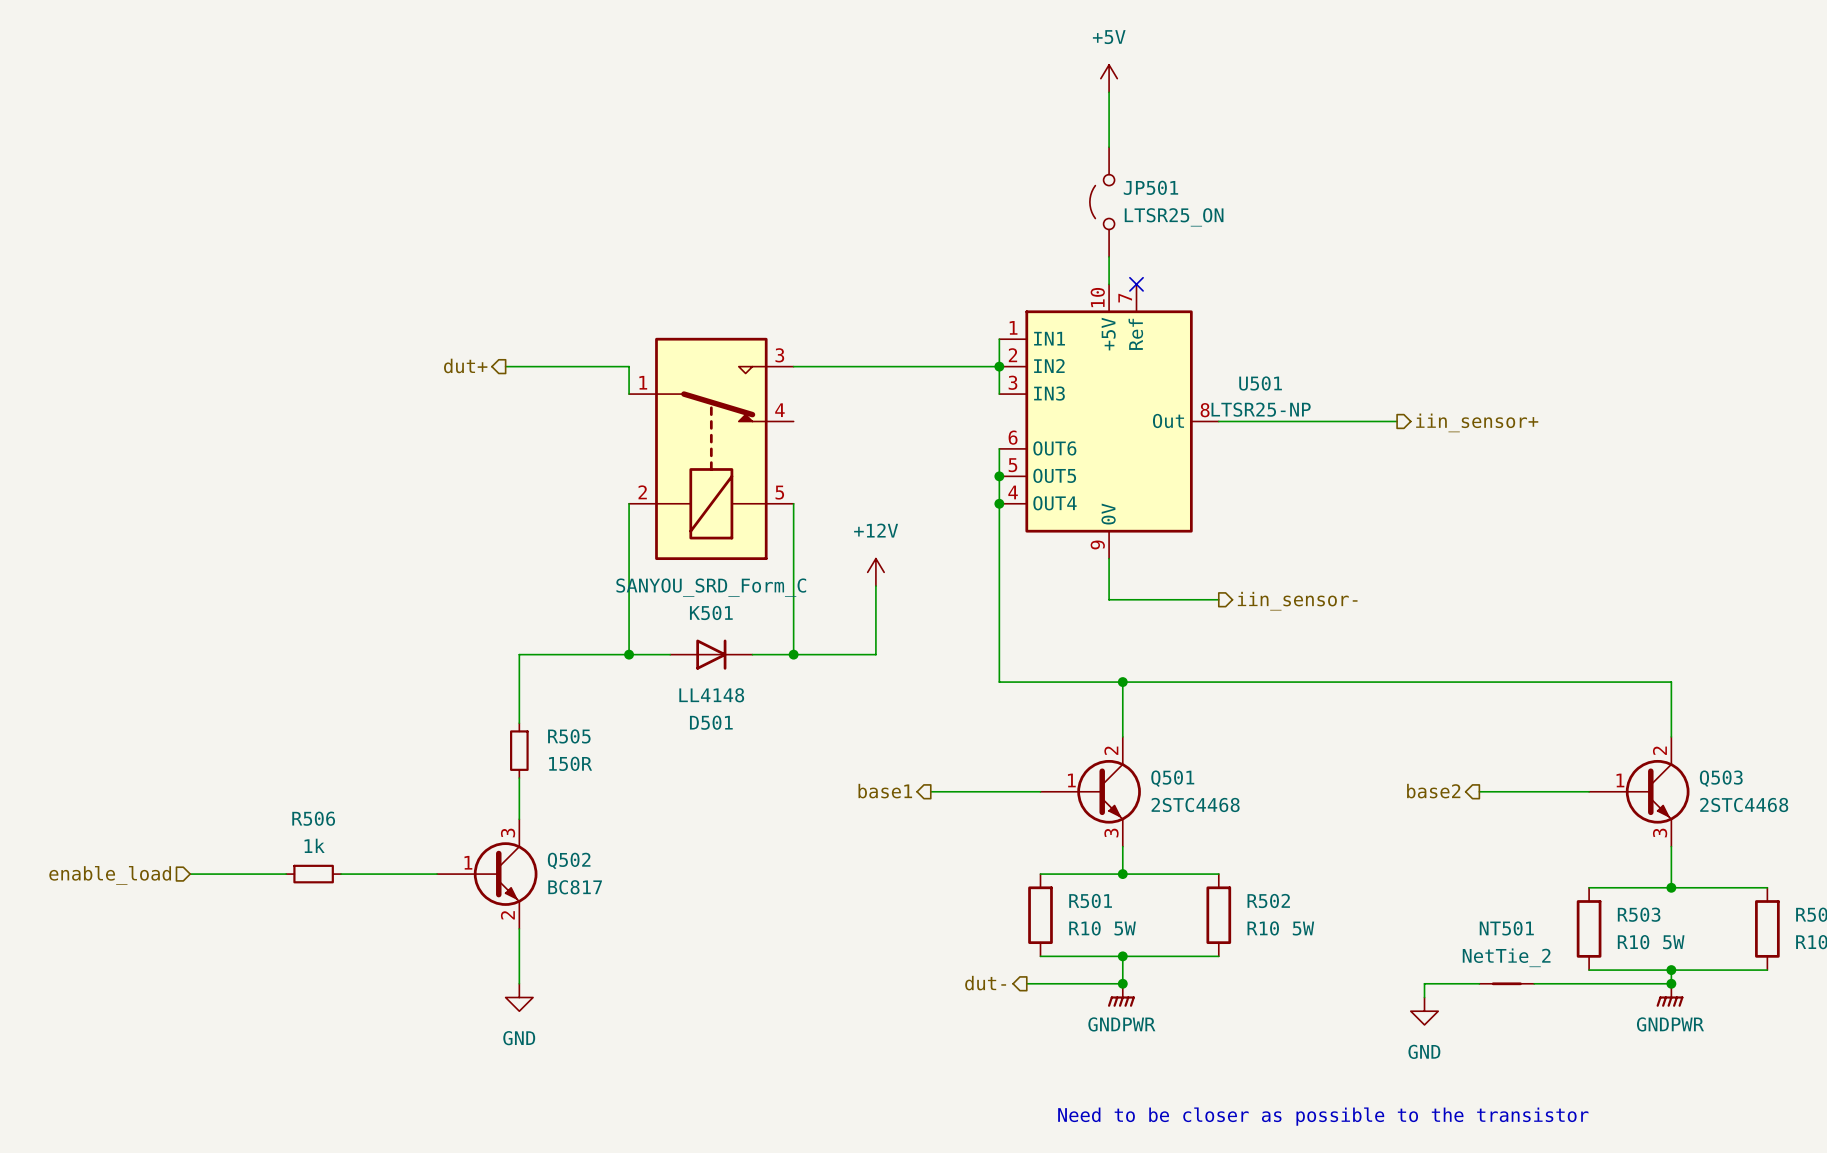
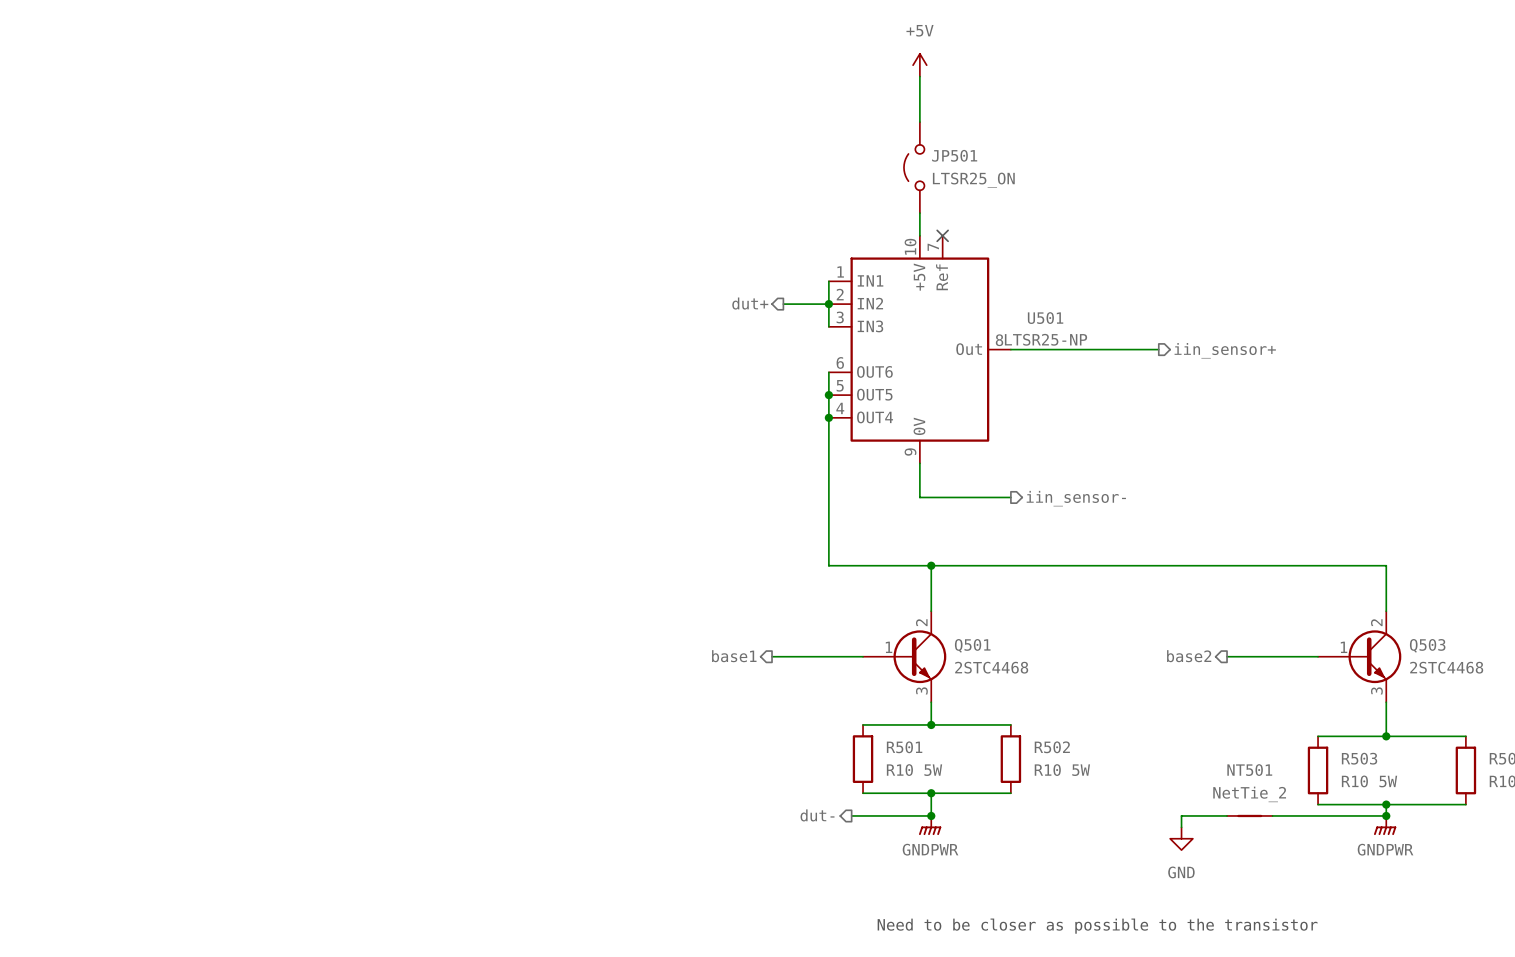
hierarchical label: dut+ (465, 365) -> none
hierarchical label: none -> dut+ (750, 303)
wire: (505, 366) (629, 366) (629, 394) -> none
wire: (793, 366) (944, 366) -> none
K501: SANYOU_SRD_Form_C (711, 448) -> none
wire: (629, 503) (629, 654) -> none
wire: (793, 503) (793, 654) -> none
power symbol: +12V (875, 572) -> none
wire: (875, 586) (875, 654) (752, 654) -> none
junction: (629, 654) -> none
wire: (670, 654) (519, 654) (519, 723) -> none
D501: LL4148 (711, 654) -> none
junction: (793, 654) -> none
R505: 150R (519, 750) -> none
wire: (519, 778) (519, 819) -> none
wire: (190, 874) (286, 874) -> none
R506: 1k (313, 874) -> none
wire: (341, 874) (437, 874) -> none
Q502: BC817 (487, 874) -> none
hierarchical label: enable_load (110, 875) -> none
wire: (519, 928) (519, 983) -> none
power symbol: GND (519, 997) -> none

